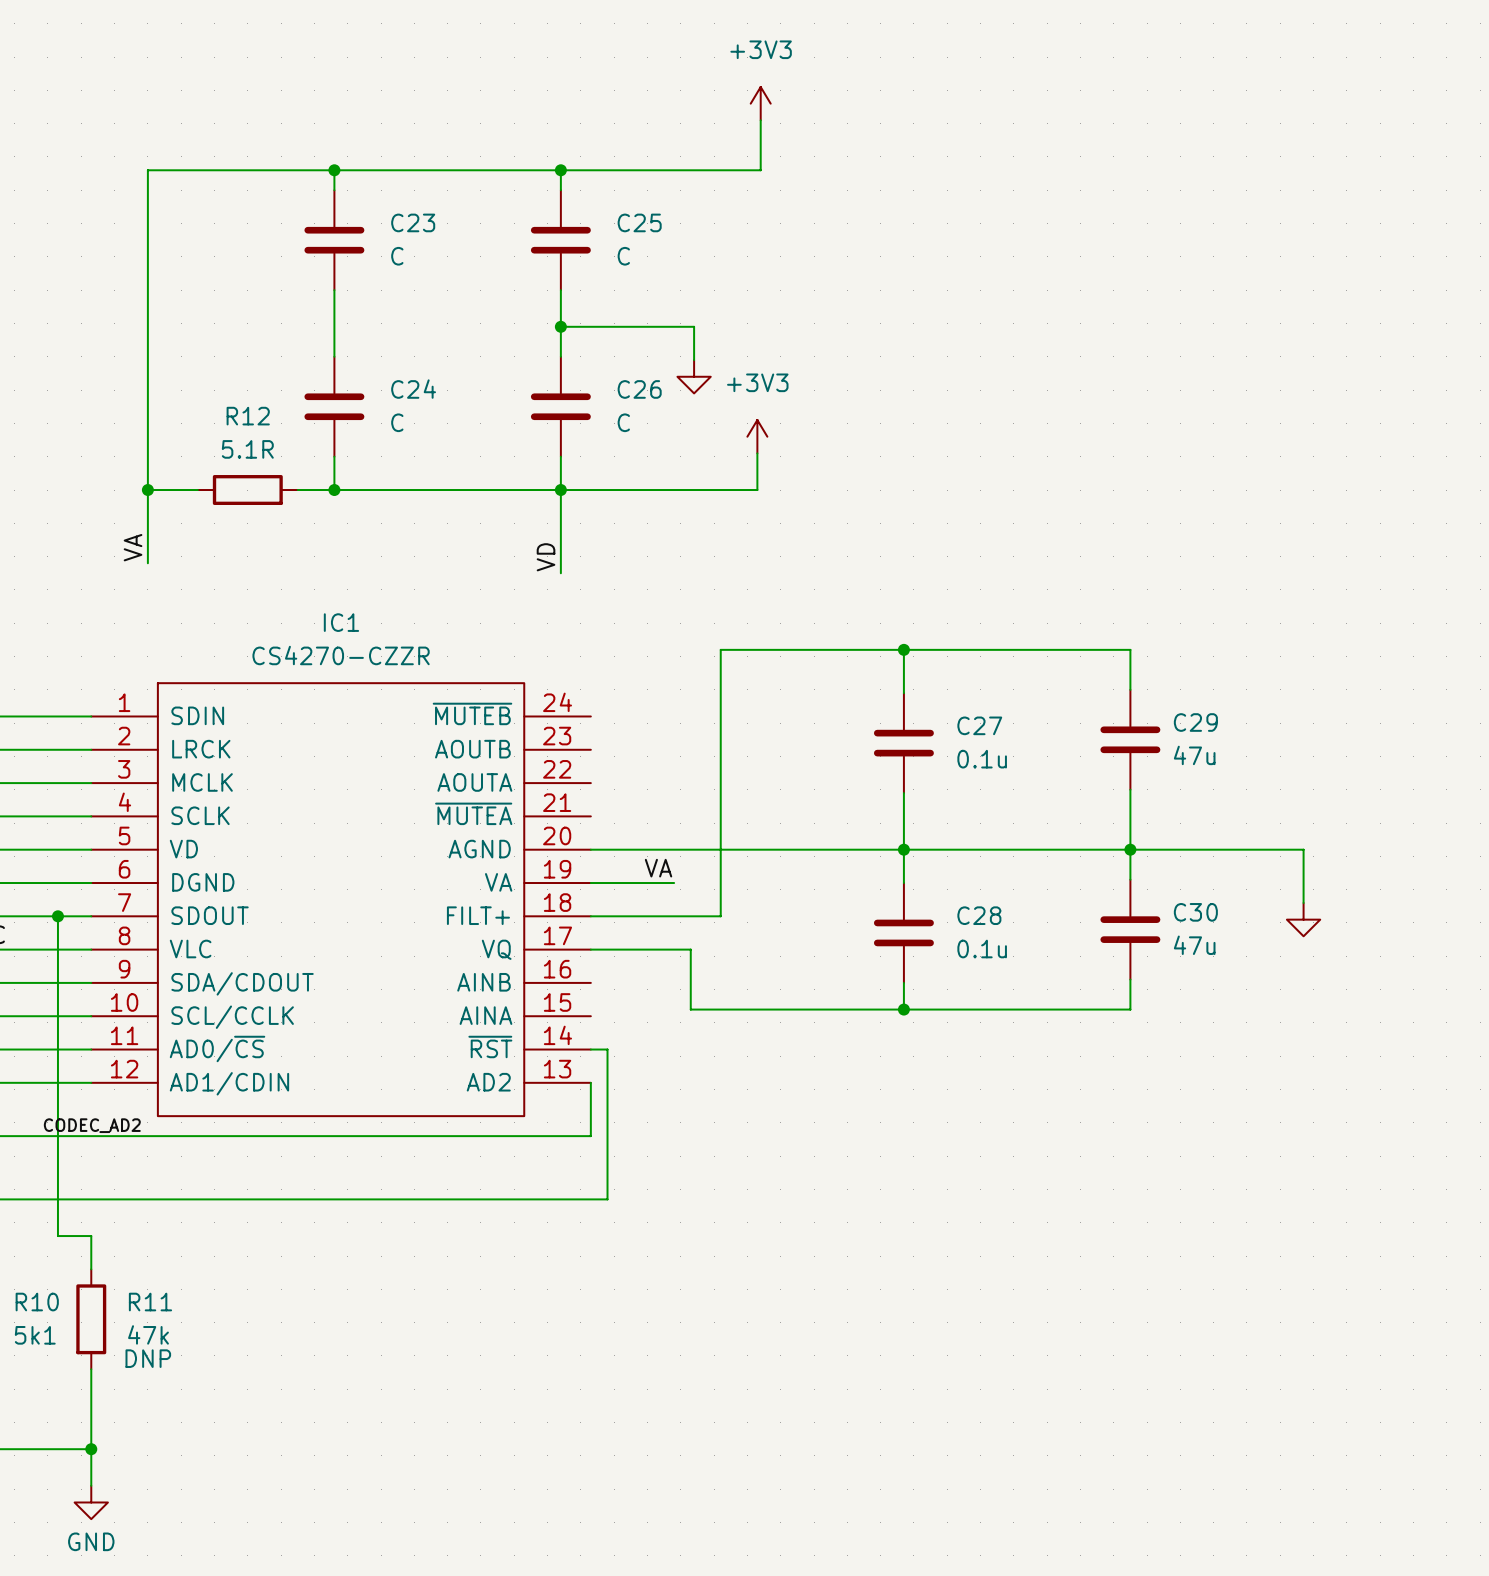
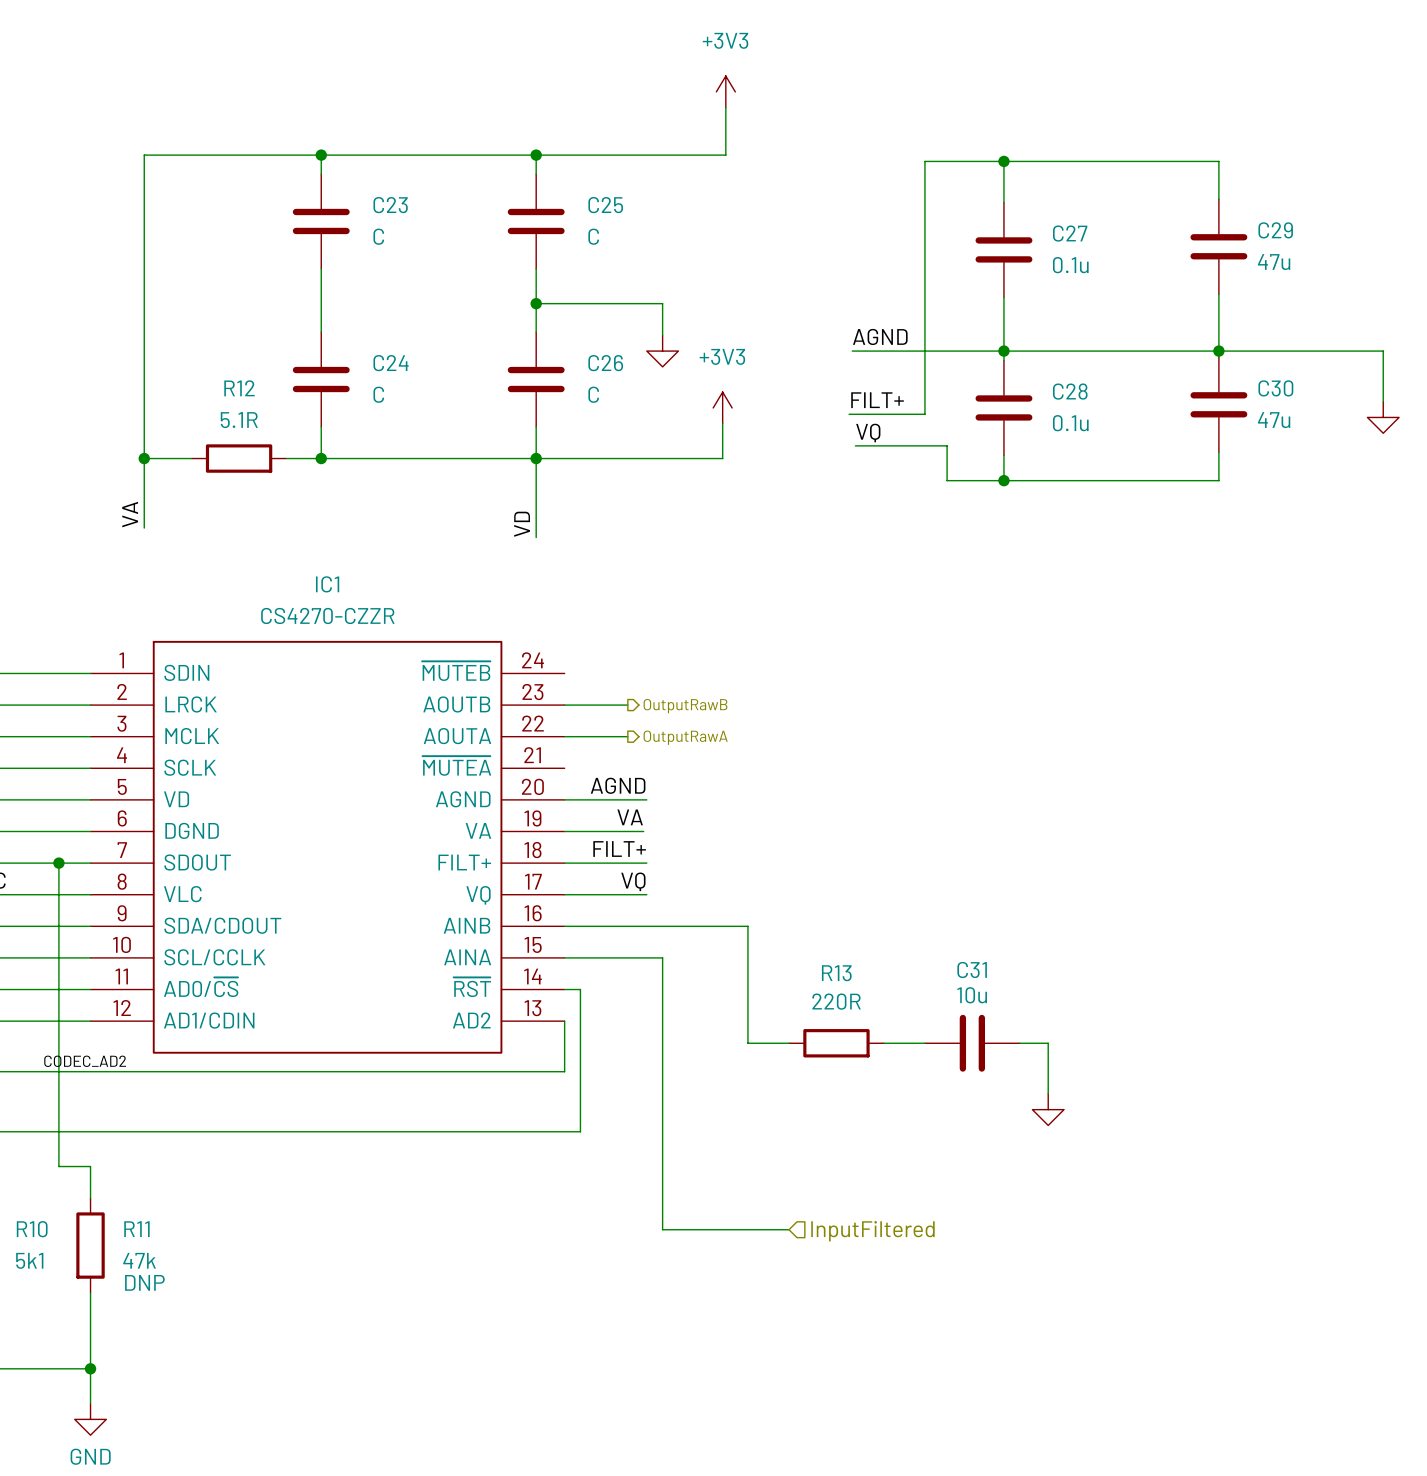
wire: none -> (1003, 161) (1003, 202)
junction: none -> (1003, 161)
wire: none -> (1218, 199) (1218, 161) (924, 161) (924, 414) (849, 414)
wire: none -> (1218, 294) (1218, 357)
wire: none -> (1003, 297) (1003, 360)
label: none -> AGND (880, 336)
wire: none -> (852, 351) (1383, 351) (1383, 401)
junction: none -> (1003, 351)
junction: none -> (1218, 351)
label: none -> FILT+ (877, 400)
power symbol: none -> (1383, 417)
label: none -> VQ (868, 433)
wire: none -> (855, 445) (947, 445) (947, 480) (1218, 480) (1218, 452)
wire: none -> (1003, 455) (1003, 480)
junction: none -> (1003, 480)
wire: (903, 649) (903, 693) -> none
junction: (903, 649) -> none
wire: (1130, 689) (1130, 649) (720, 649) (720, 916) (677, 916) -> none
C29 position: (1130, 739) -> (1218, 246)
C27 position: (903, 743) -> (1003, 249)
wire: none -> (564, 705) (627, 705)
hierarchical label: none -> OutputRawB (685, 706)
wire: none -> (564, 736) (627, 736)
hierarchical label: none -> OutputRawA (685, 737)
wire: (1130, 789) (1130, 879) -> none
wire: (903, 793) (903, 883) -> none
label: none -> AGND (618, 785)
wire: (677, 849) (1303, 849) (1303, 902) -> none
junction: (903, 849) -> none
junction: (1130, 849) -> none
label: none -> FILT+ (619, 849)
power symbol: (1303, 919) -> none
C30 position: (1130, 929) -> (1218, 404)
C28 position: (903, 932) -> (1003, 407)
label: none -> VQ (633, 881)
wire: (677, 949) (690, 949) (690, 1009) (1130, 1009) (1130, 979) -> none
wire: none -> (564, 926) (747, 926) (747, 1043) (789, 1043)
wire: (903, 982) (903, 1009) -> none
junction: (903, 1009) -> none
wire: none -> (564, 957) (662, 957) (662, 1229) (789, 1229)
R13: none -> 220R (836, 1043)
wire: none -> (883, 1043) (924, 1043)
C31: none -> 10u (972, 1043)
wire: none -> (1019, 1043) (1048, 1043) (1048, 1093)
power symbol: none -> (1048, 1109)
hierarchical label: none -> InputFiltered (872, 1231)

